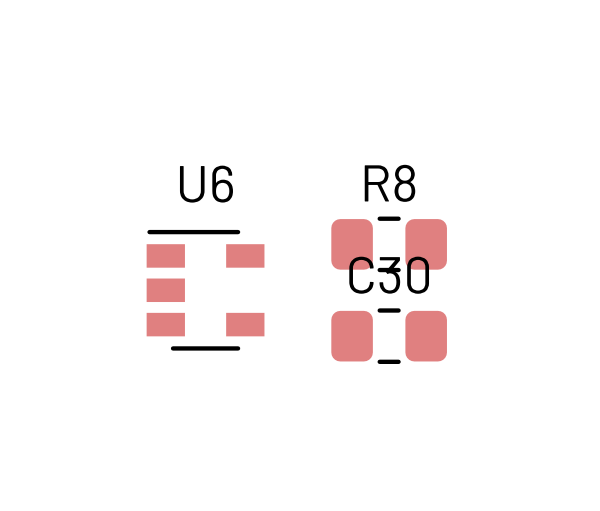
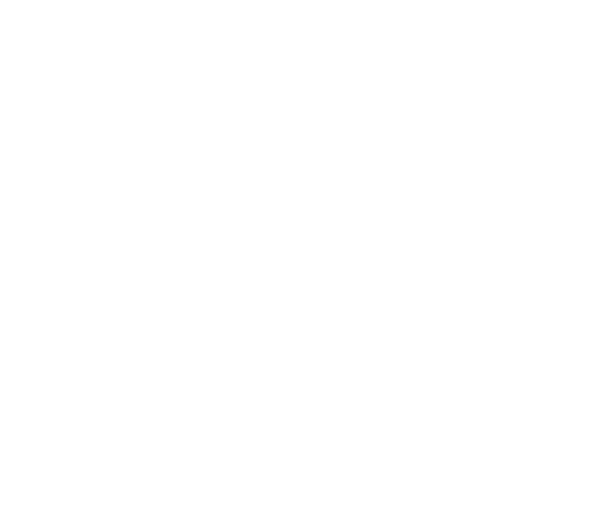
R8: (389, 244) -> none
U6: (205, 290) -> none
C30: (389, 336) -> none

